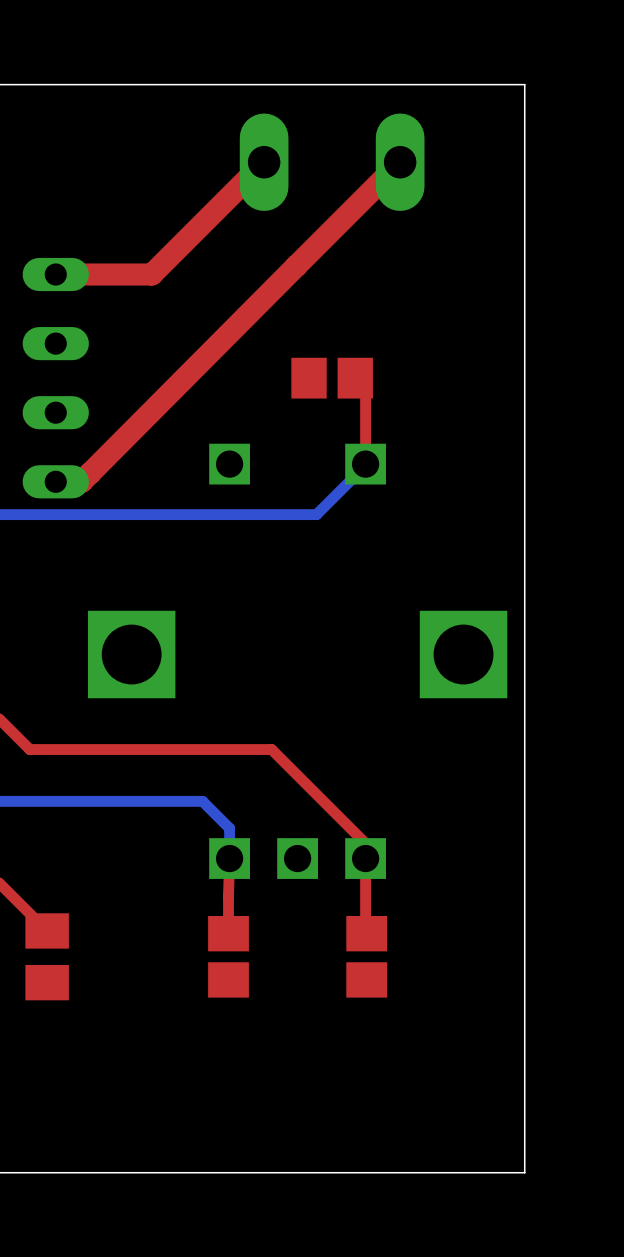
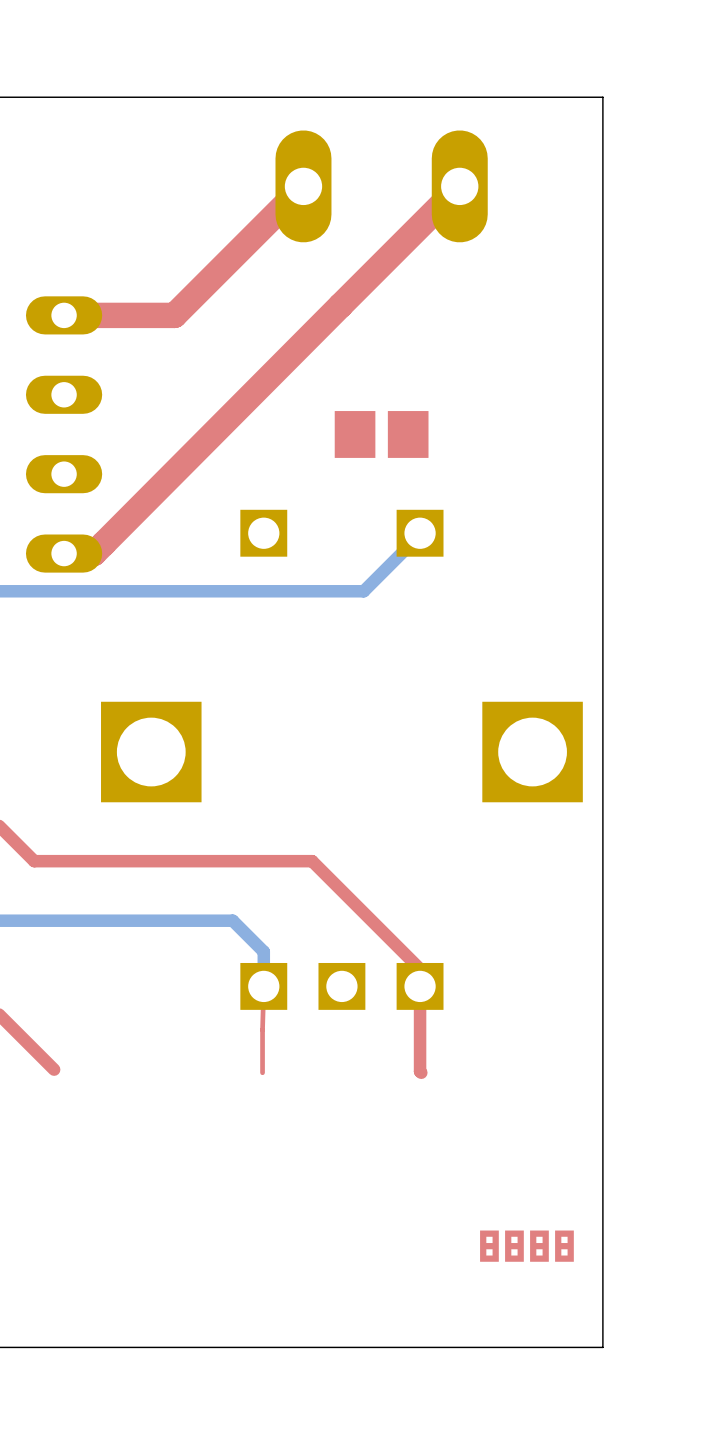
top track: (355, 378) (365, 388) (365, 464) -> none
top track width: thick (229, 858) (228, 933) -> thin (263, 986) (262, 1072)
part: (47, 956) -> none
part: (228, 956) -> none
part: (366, 956) -> none
drawing: none -> [480, 1230, 574, 1262]

